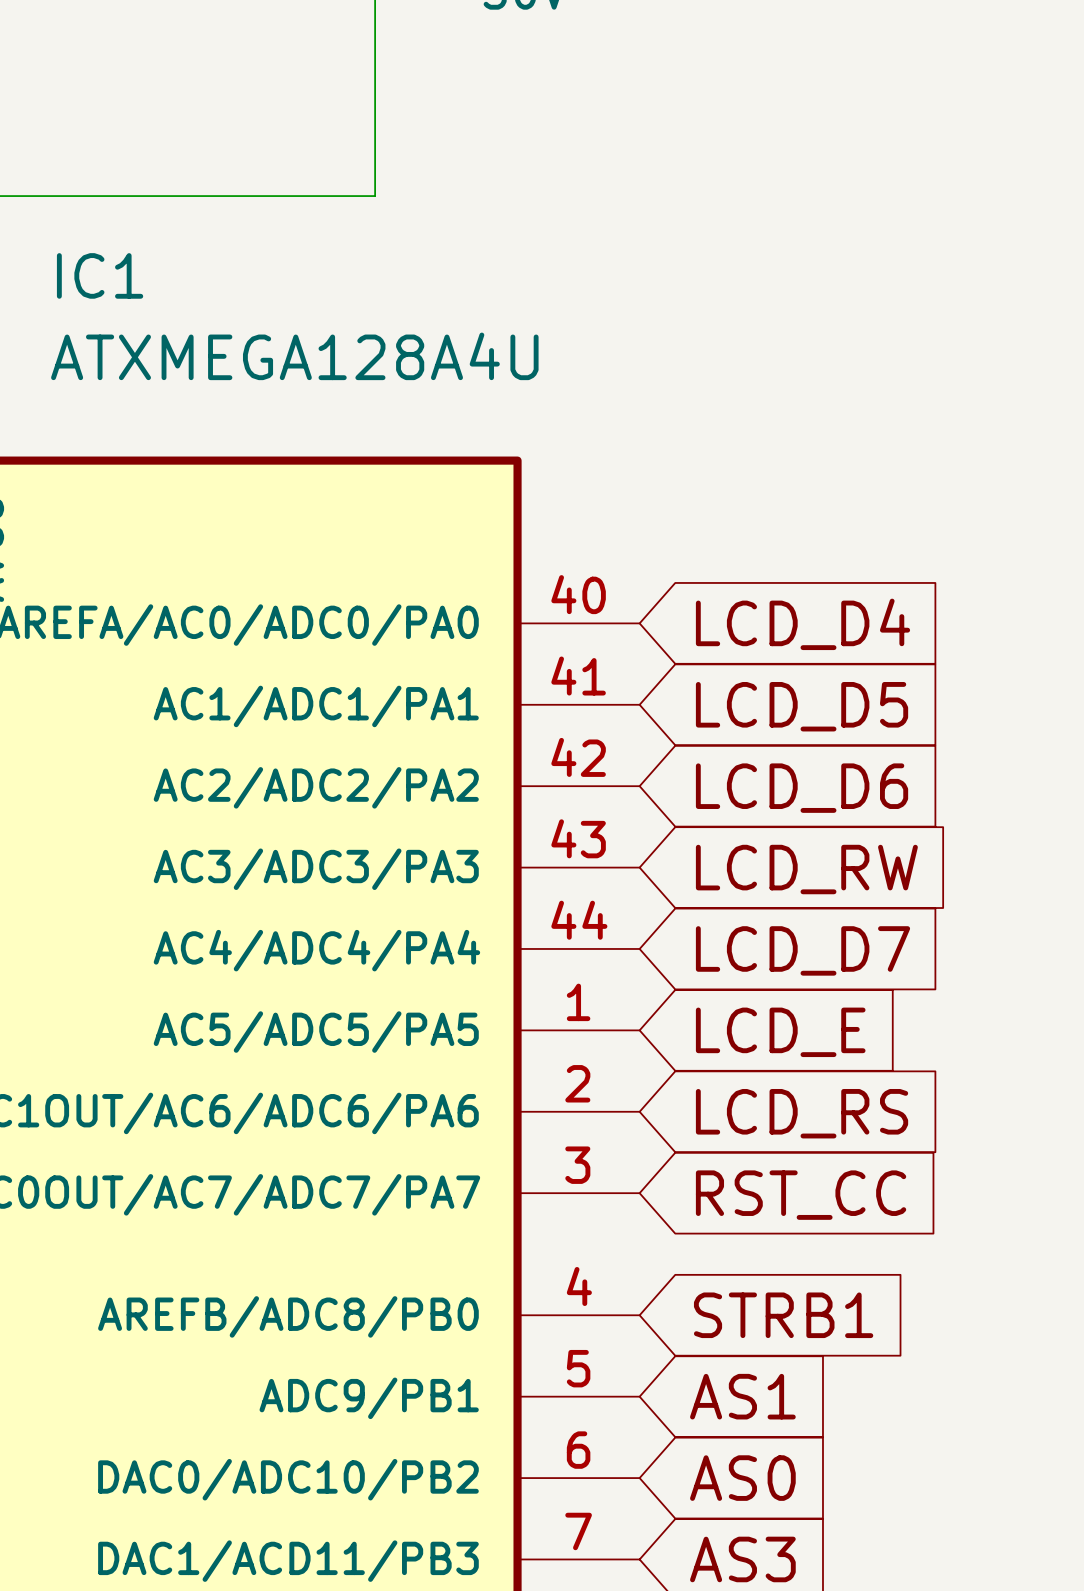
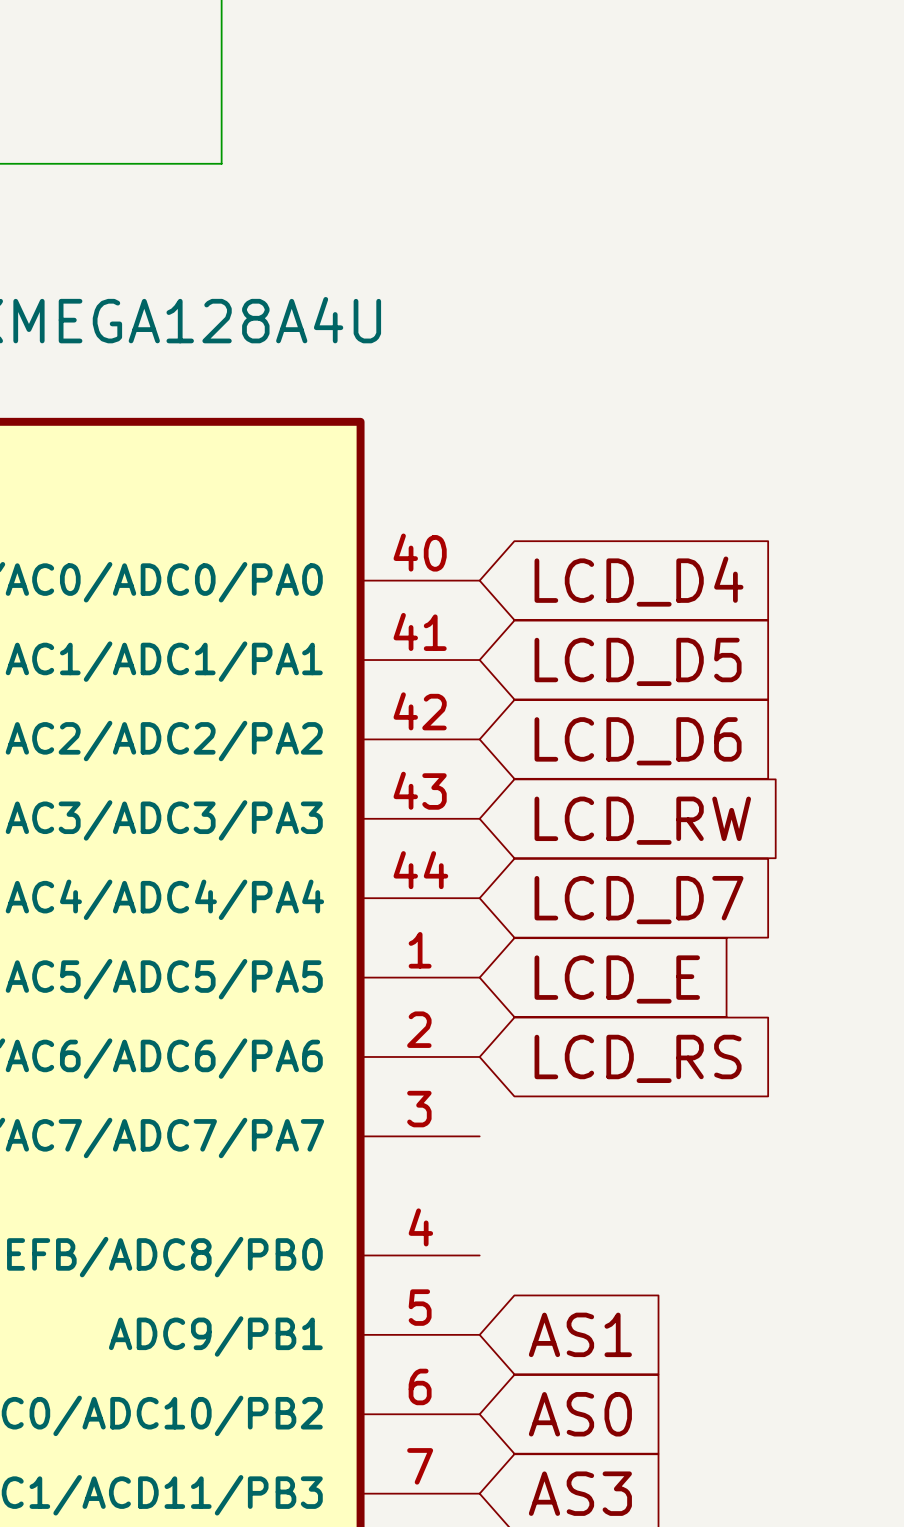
global label: RST_CC (801, 1195) -> none
global label: STRB1 (783, 1315) -> none

